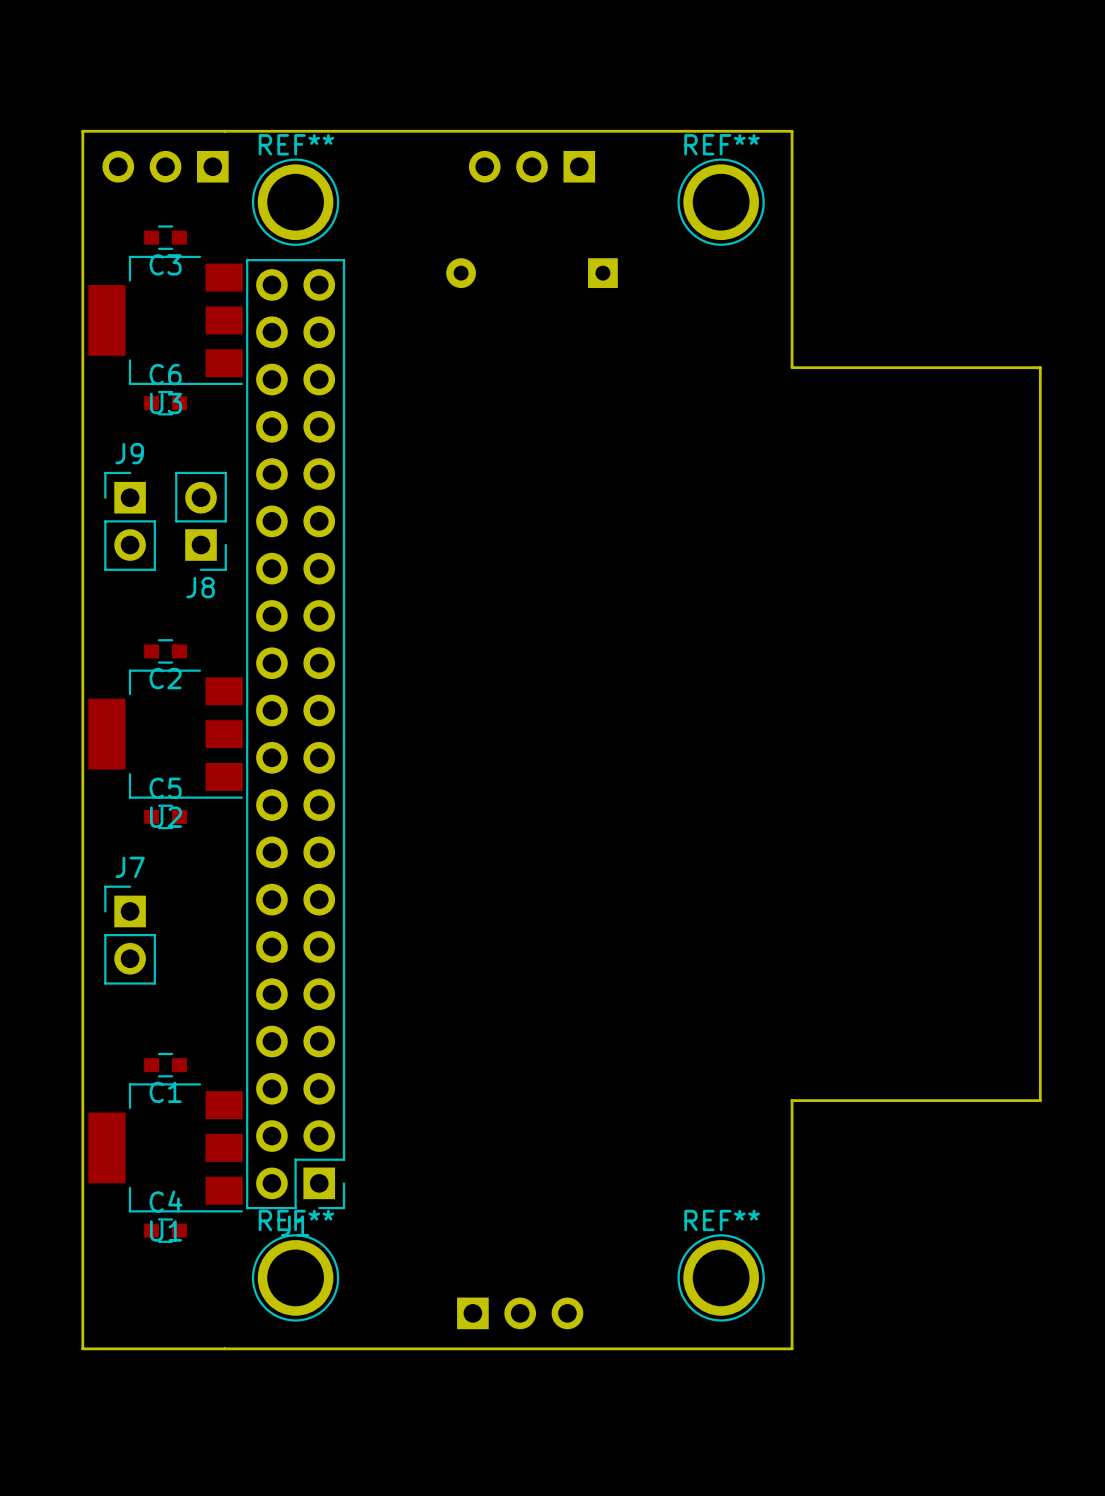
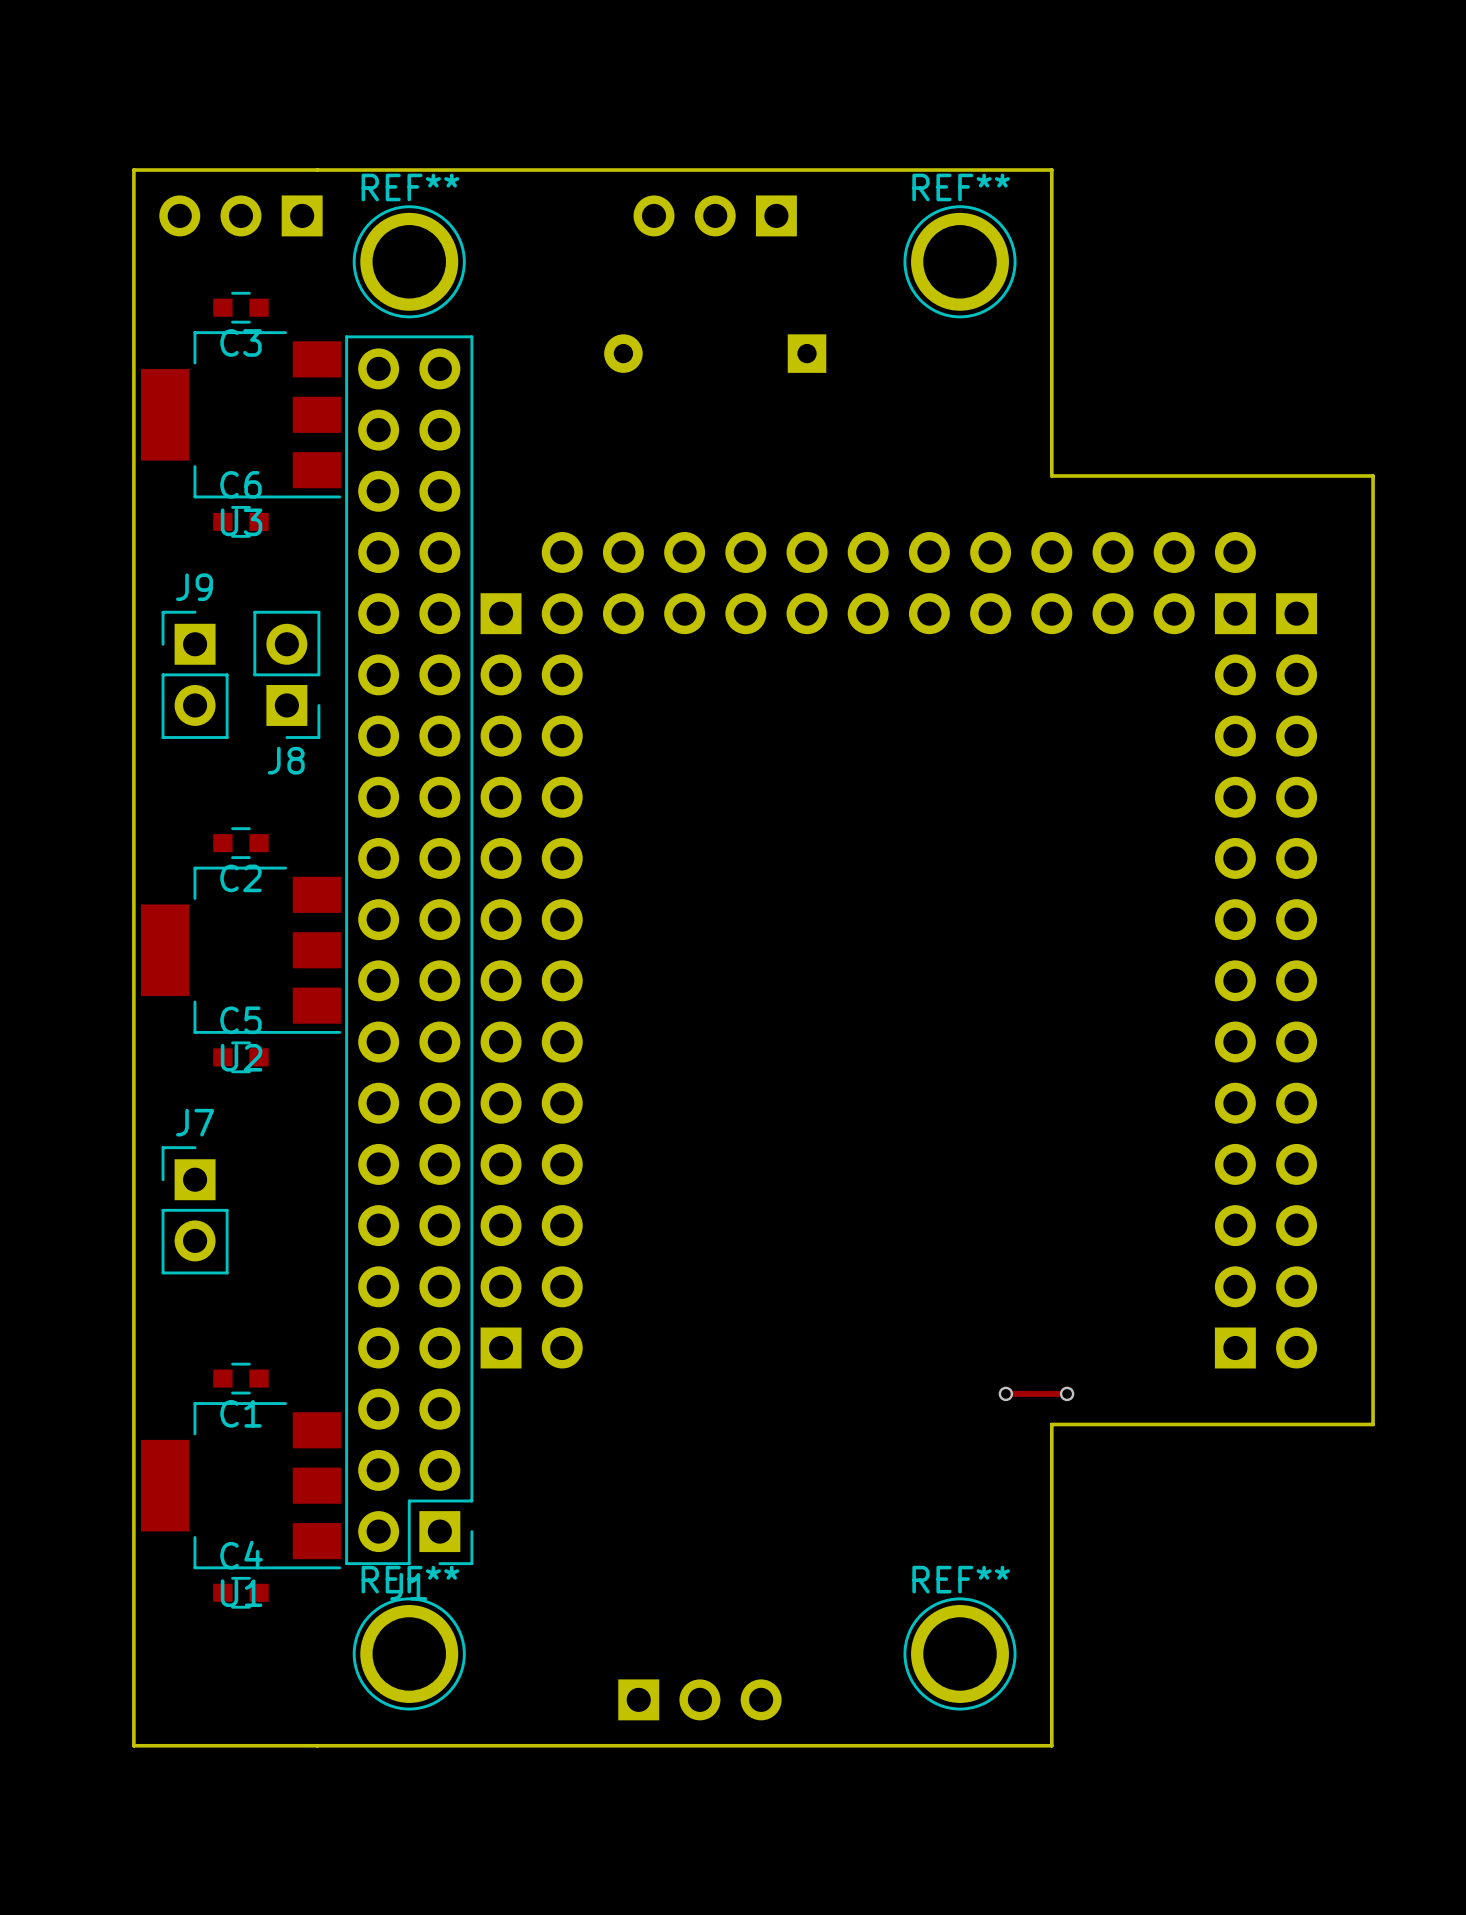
part: none -> (898, 583)
part: none -> (501, 613)
part: none -> (1296, 613)
part: none -> (531, 1011)
part: none -> (1265, 1011)
track: none -> (1005, 1393) (1067, 1393)
via: none -> (1005, 1393)
via: none -> (1067, 1393)

